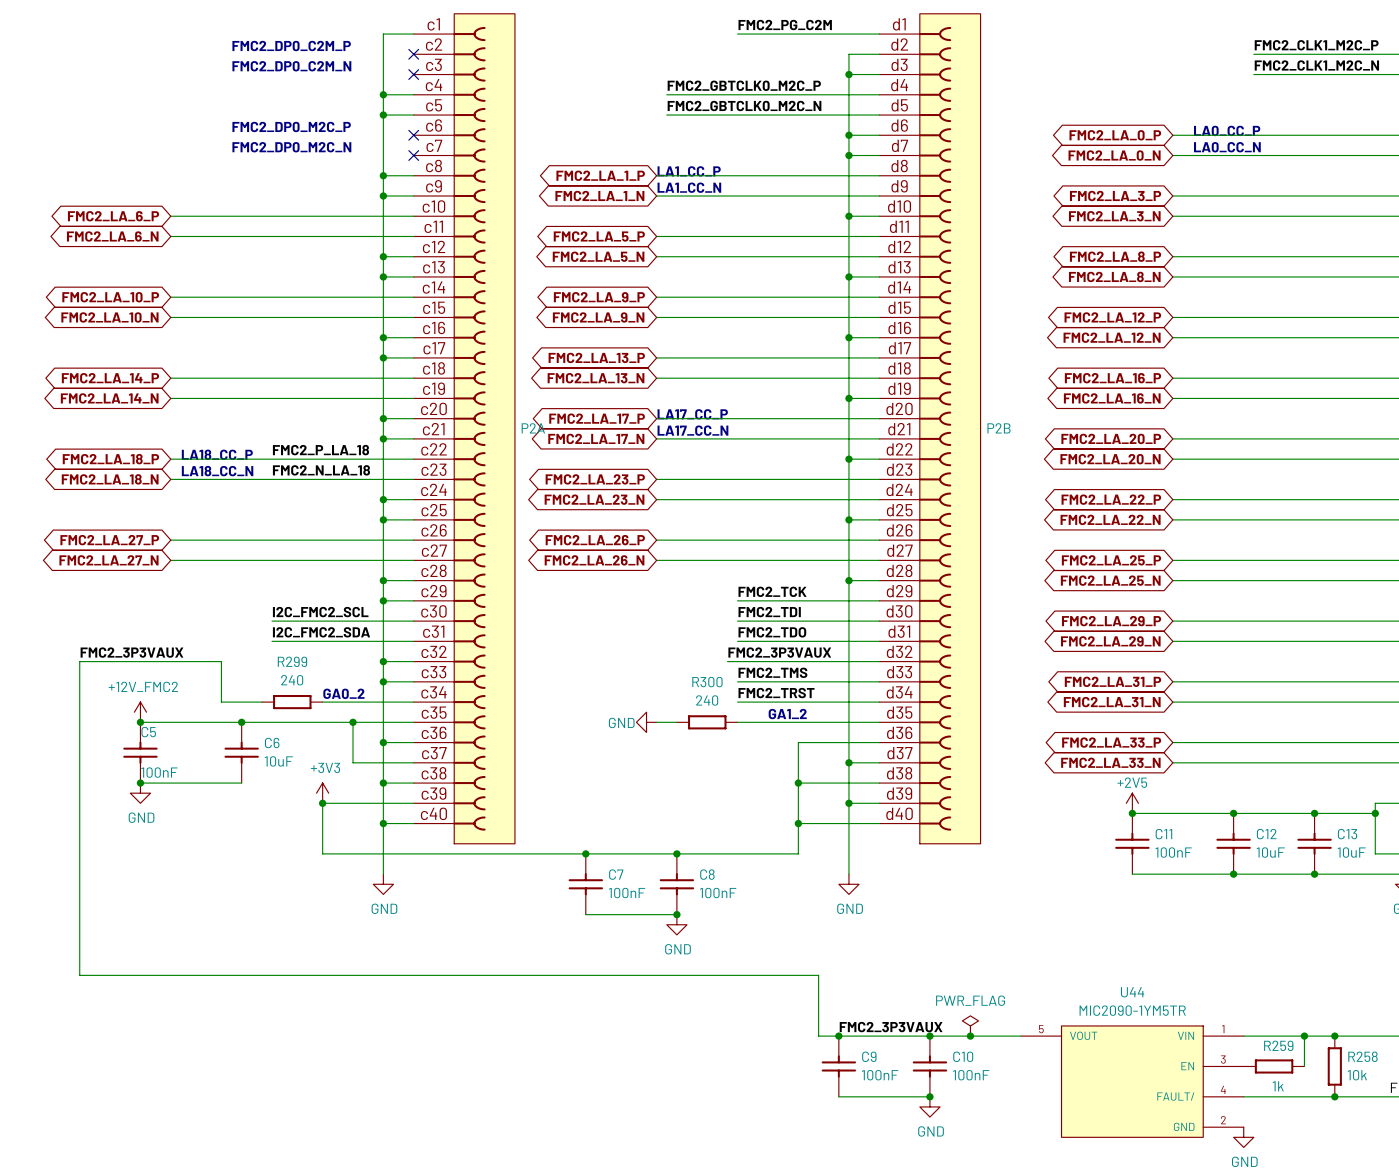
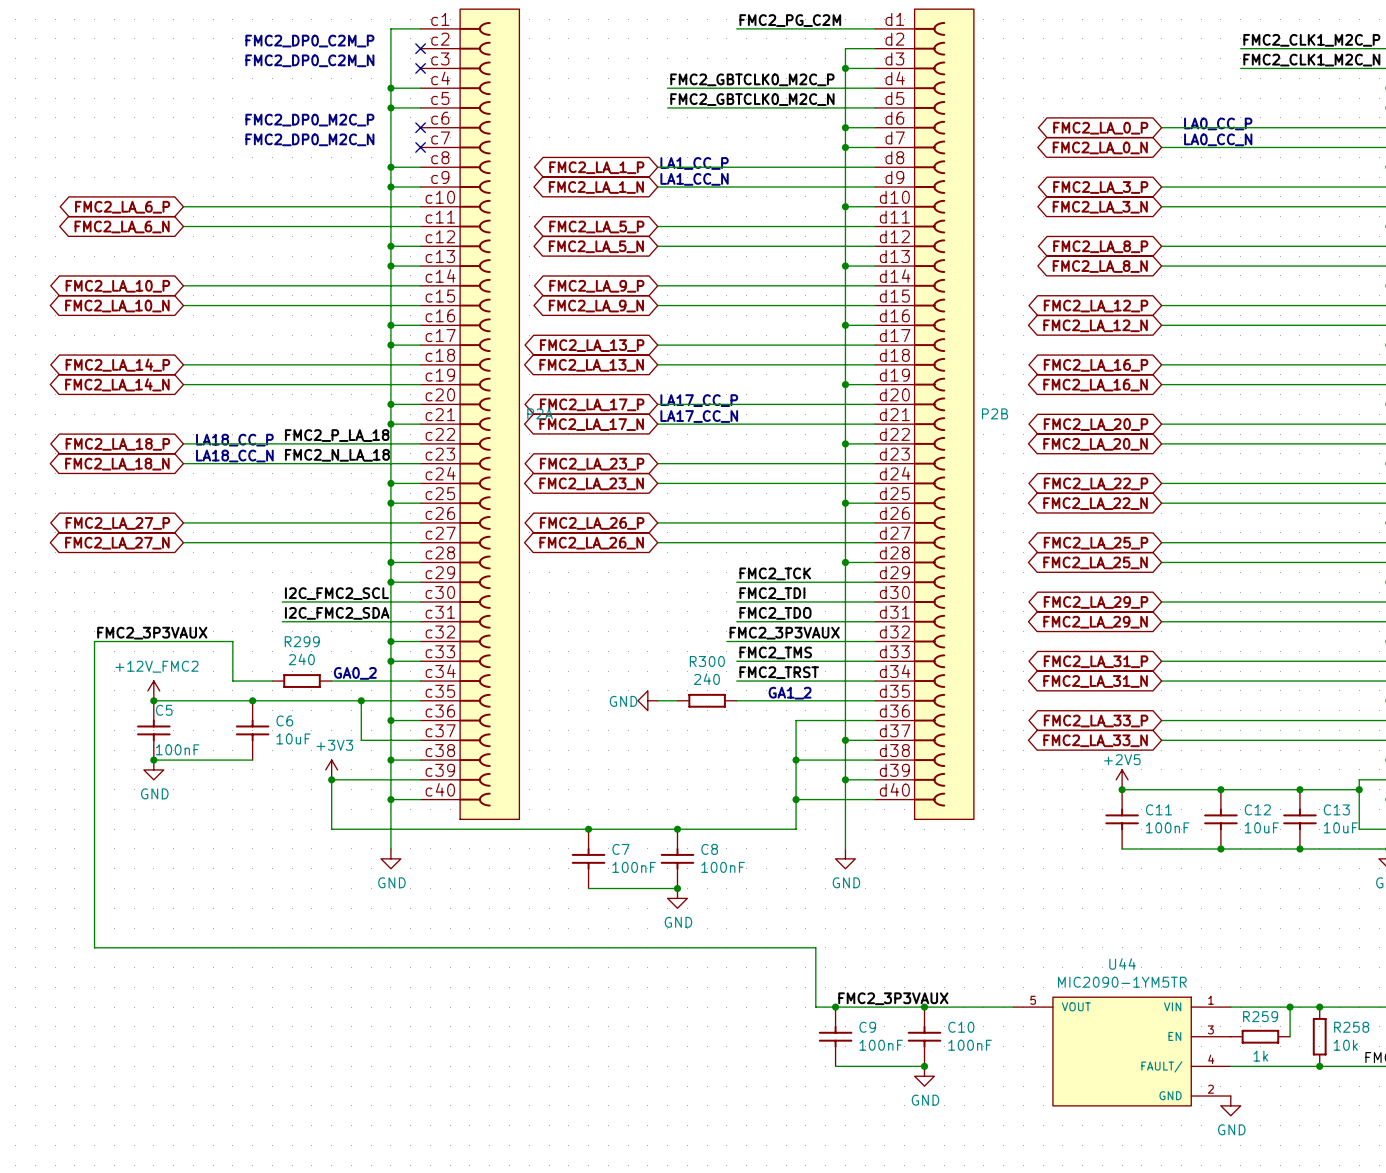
power symbol: PWR_FLAG (970, 1025) -> none
junction: (970, 1036) -> none

